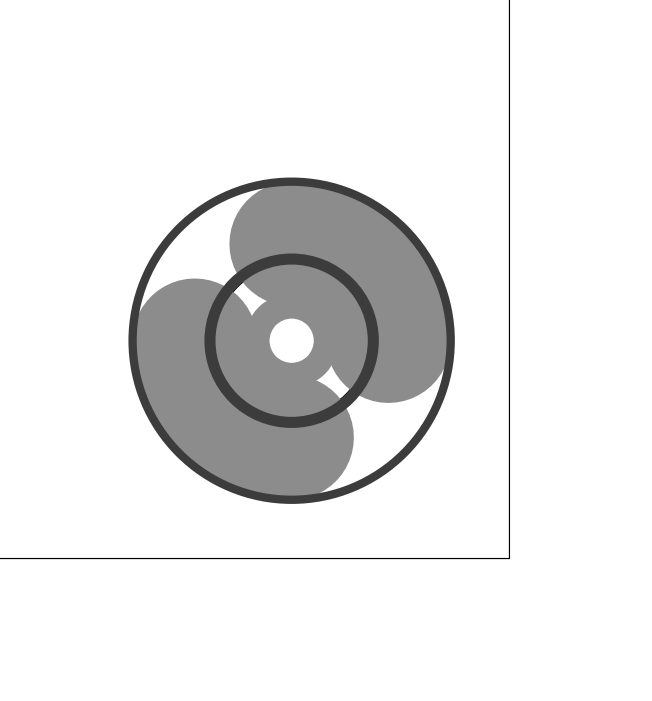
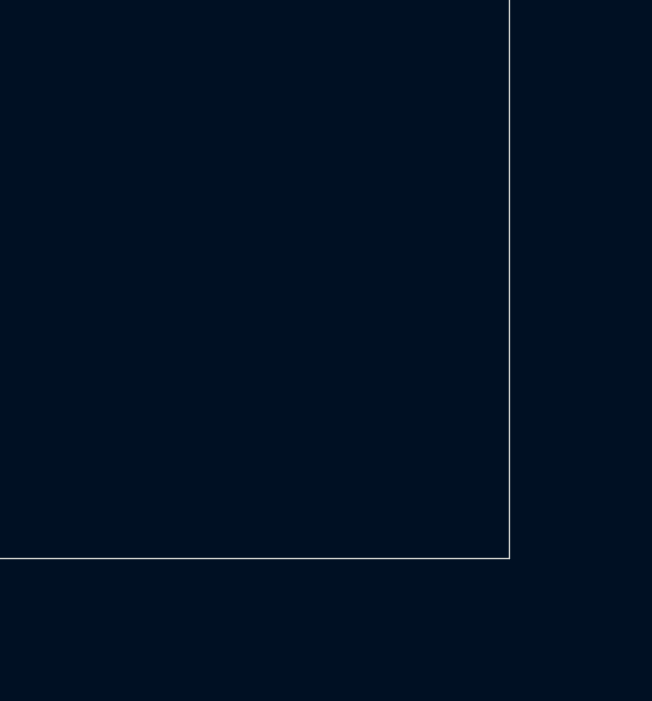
part: (291, 340) -> none

